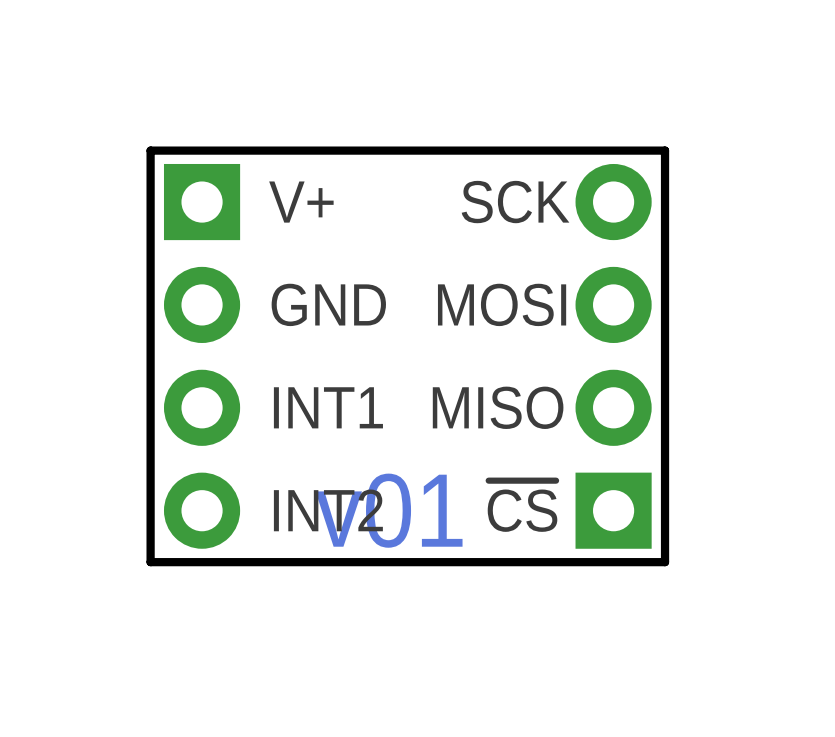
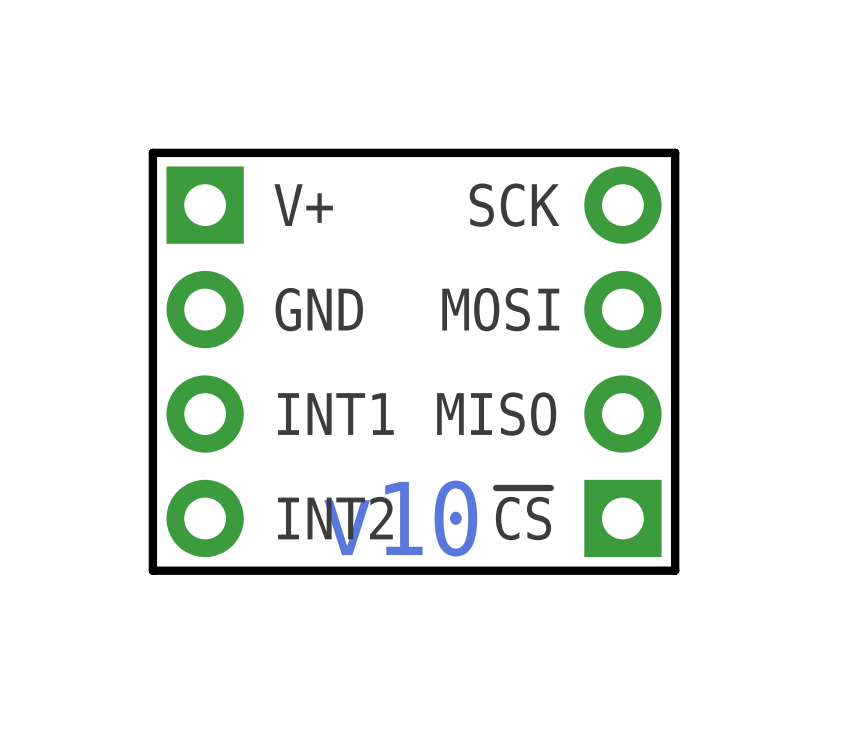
text: v01 (389, 510) -> v10 (400, 518)

